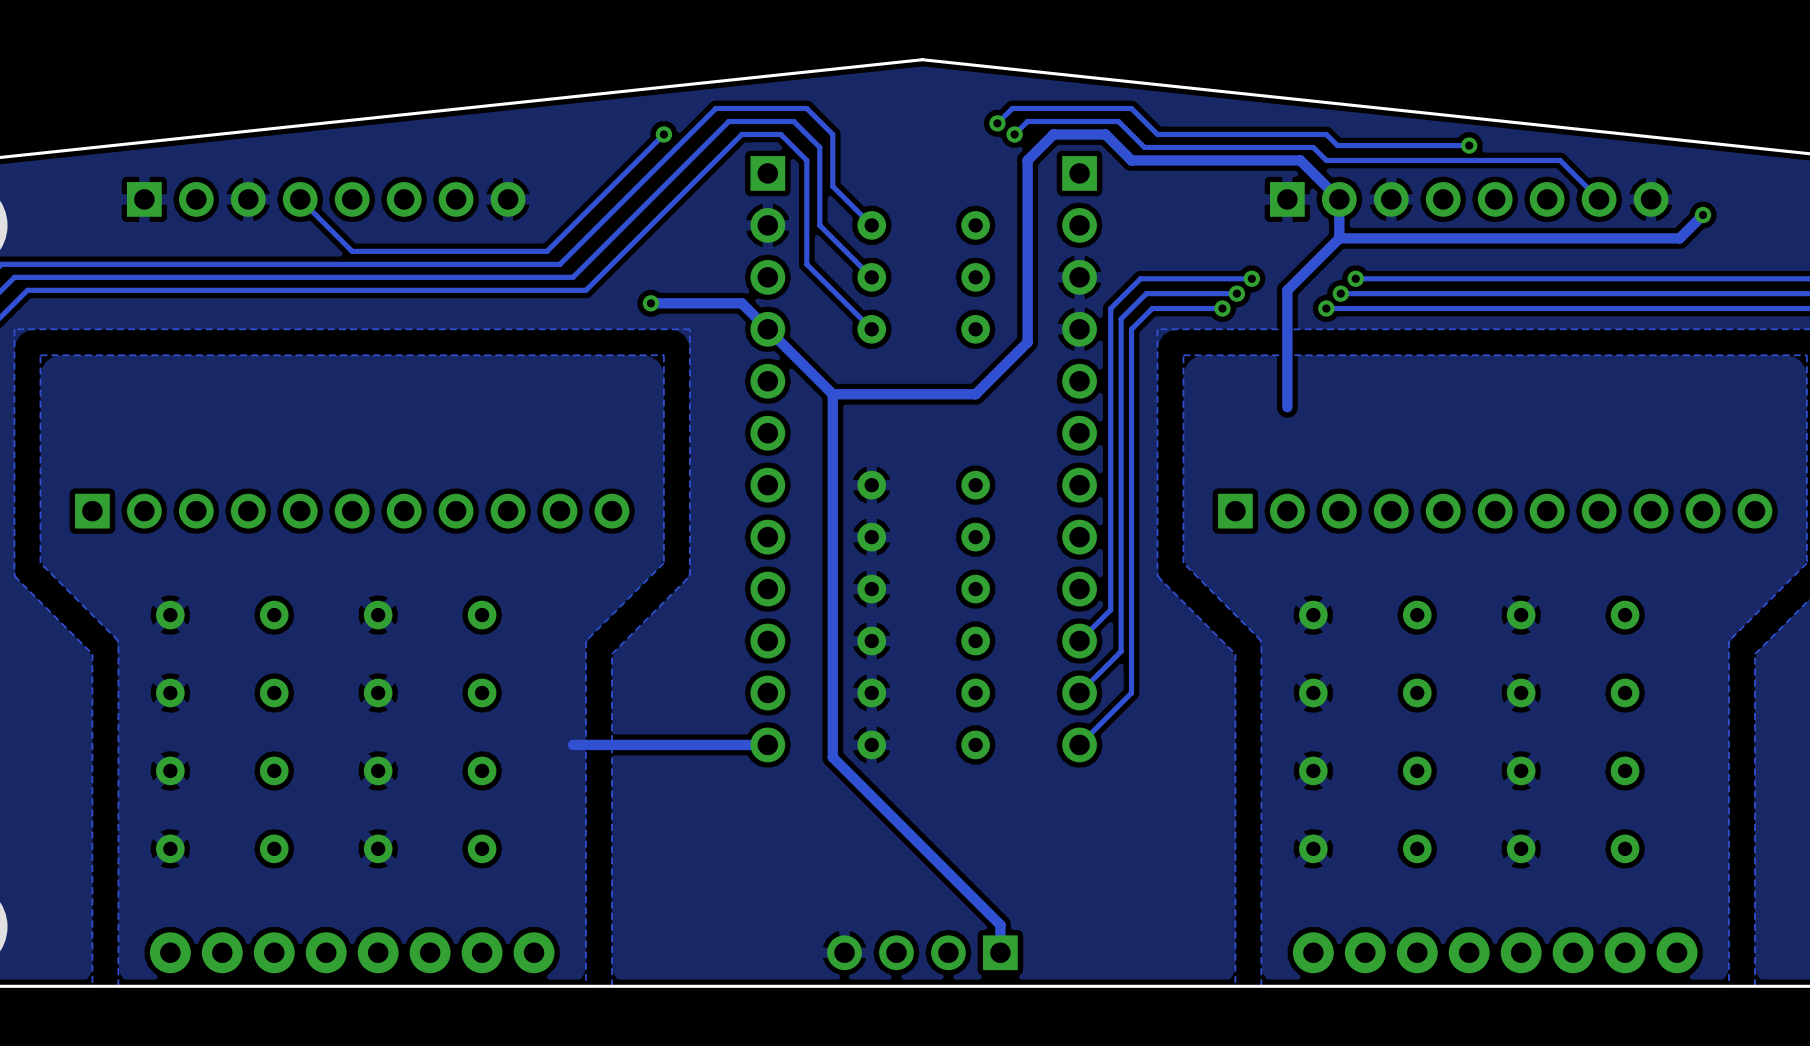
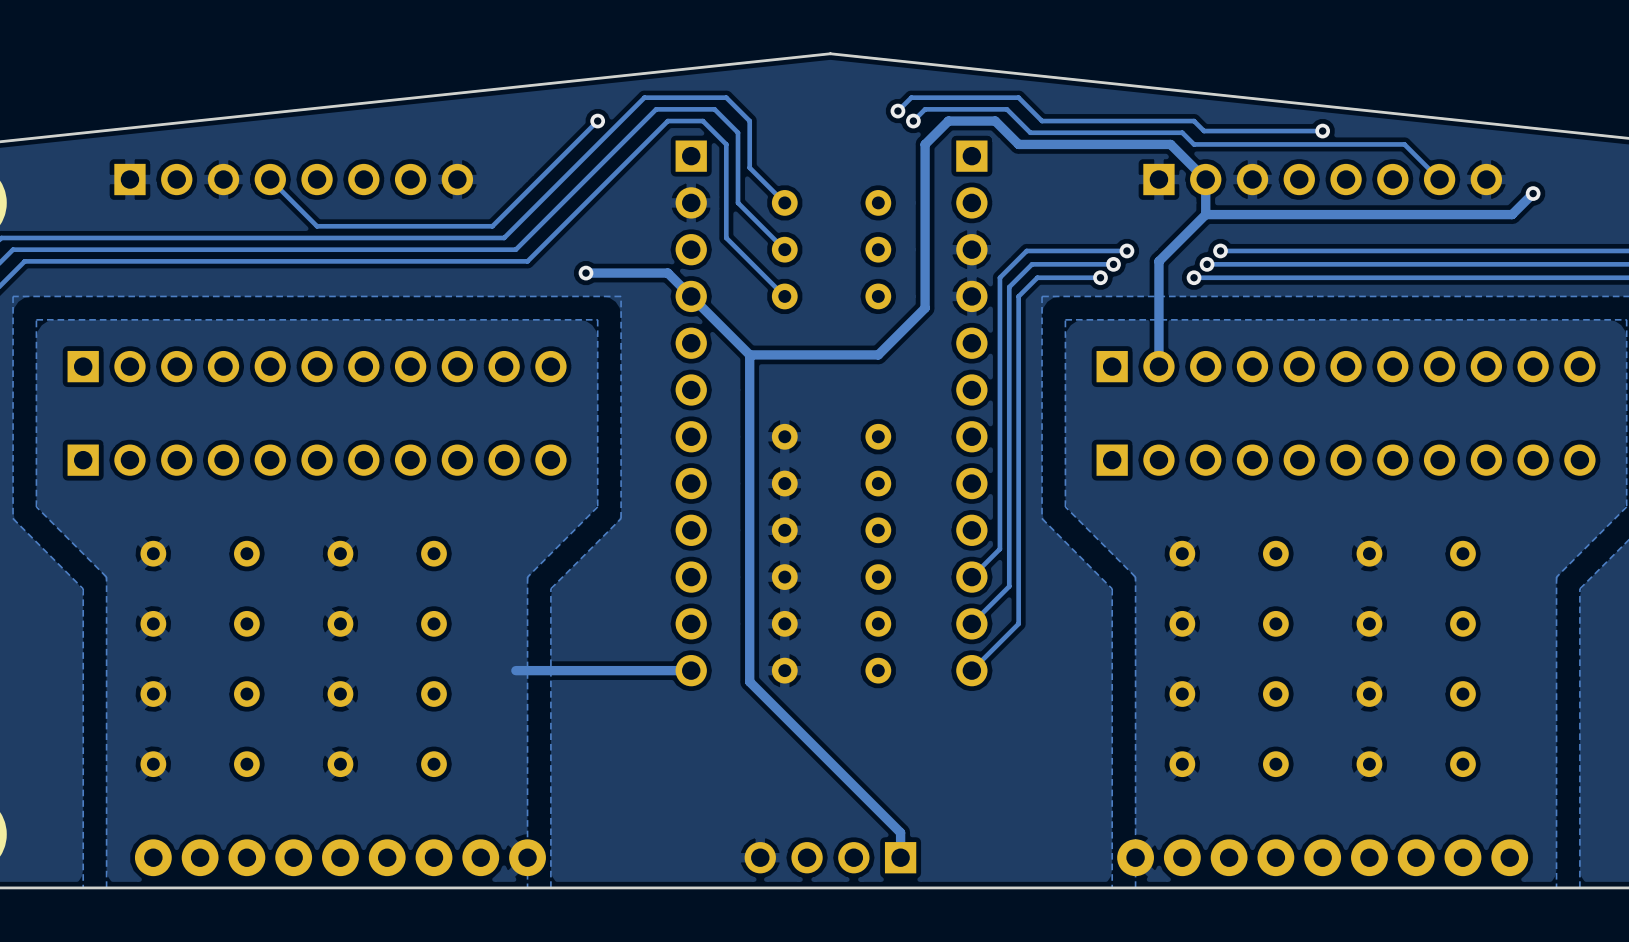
part: none -> (317, 366)
part: none -> (1346, 366)
part: none -> (527, 857)
part: none -> (1135, 857)

